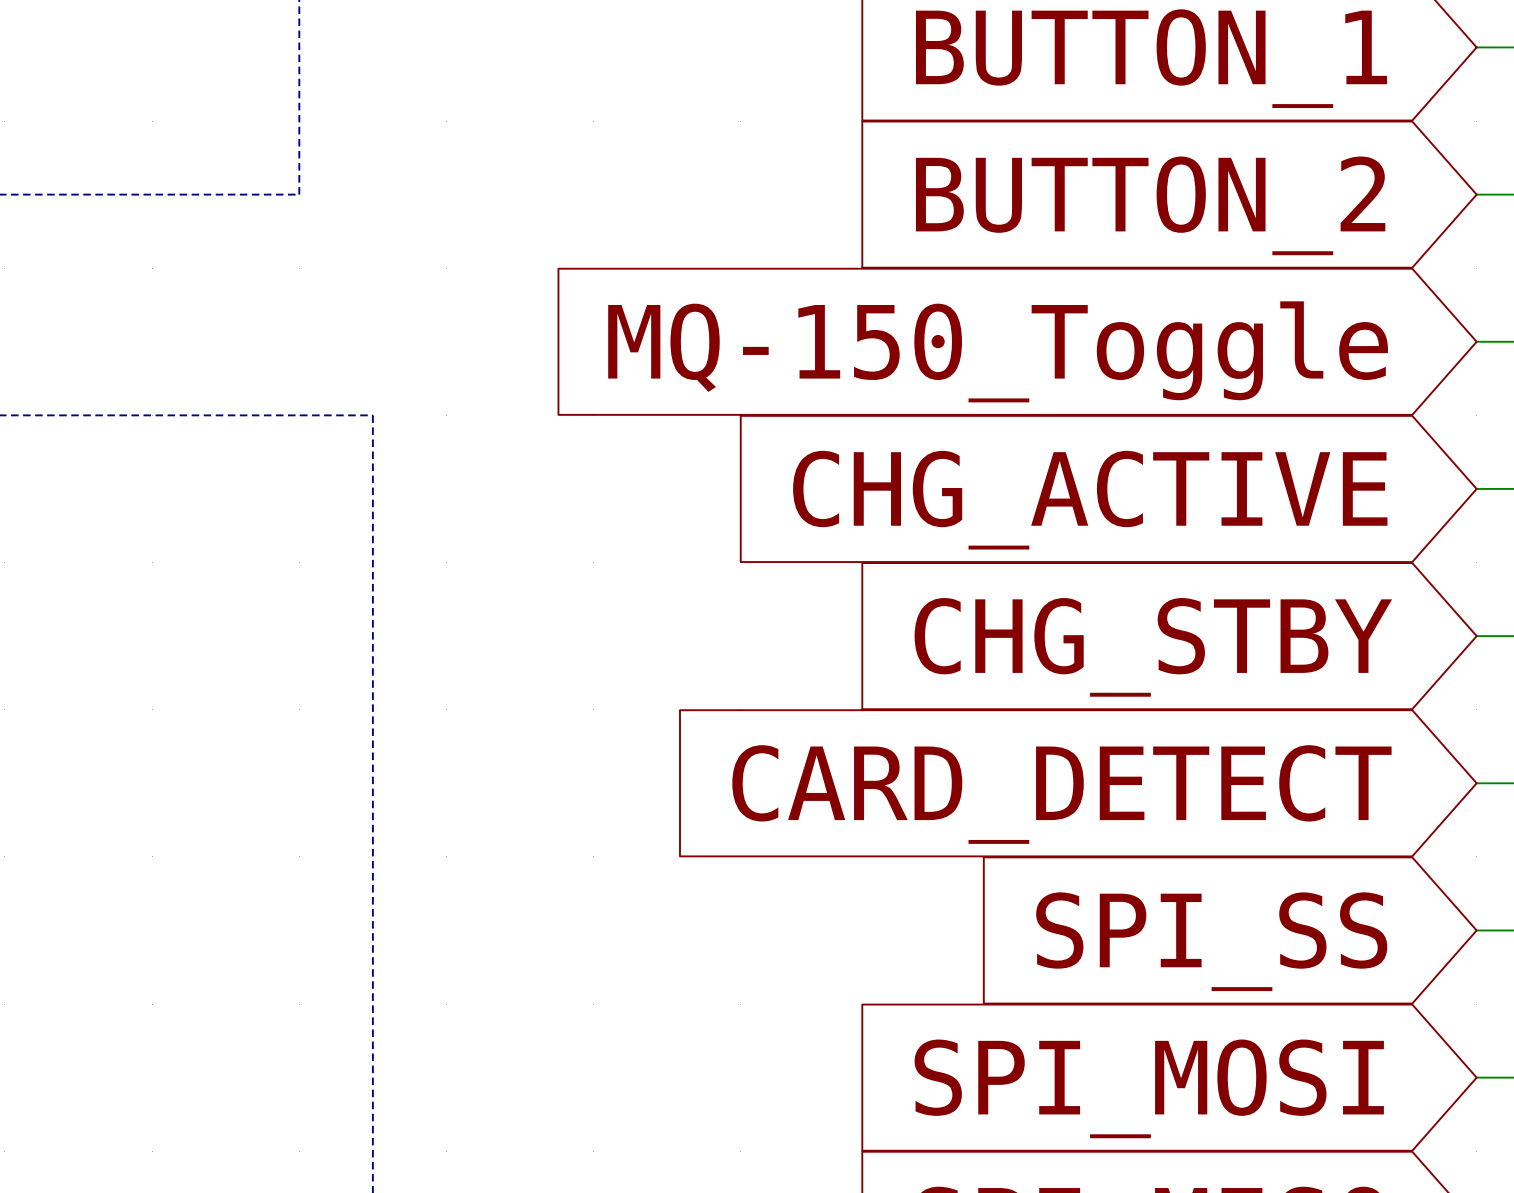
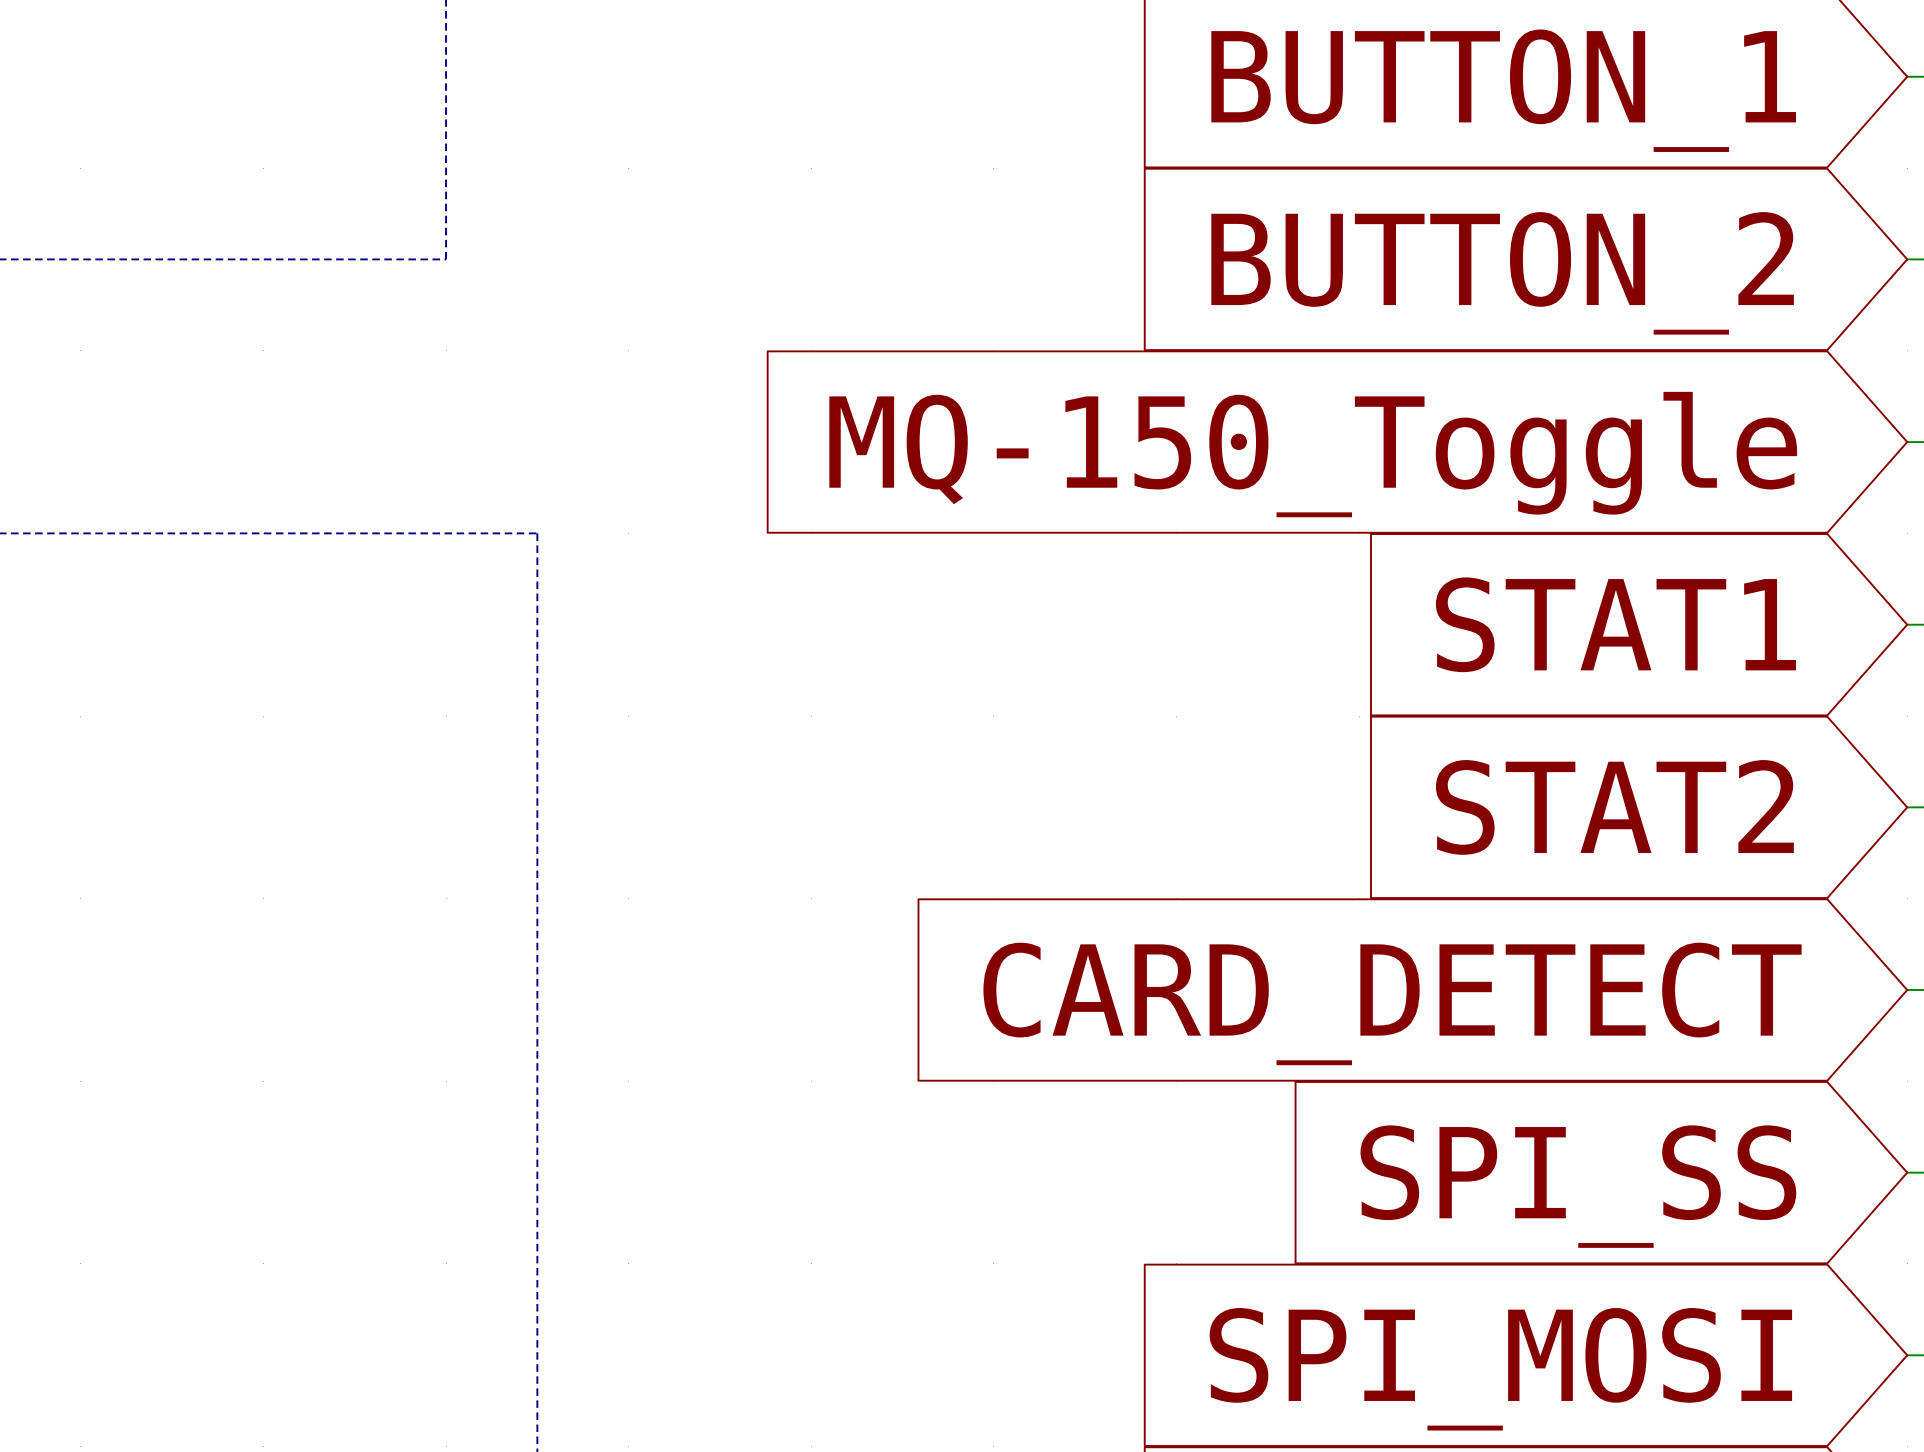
global label: CHG_ACTIVE (1090, 500) -> STAT1 (1615, 624)
global label: CHG_STBY (1153, 647) -> STAT2 (1614, 807)

